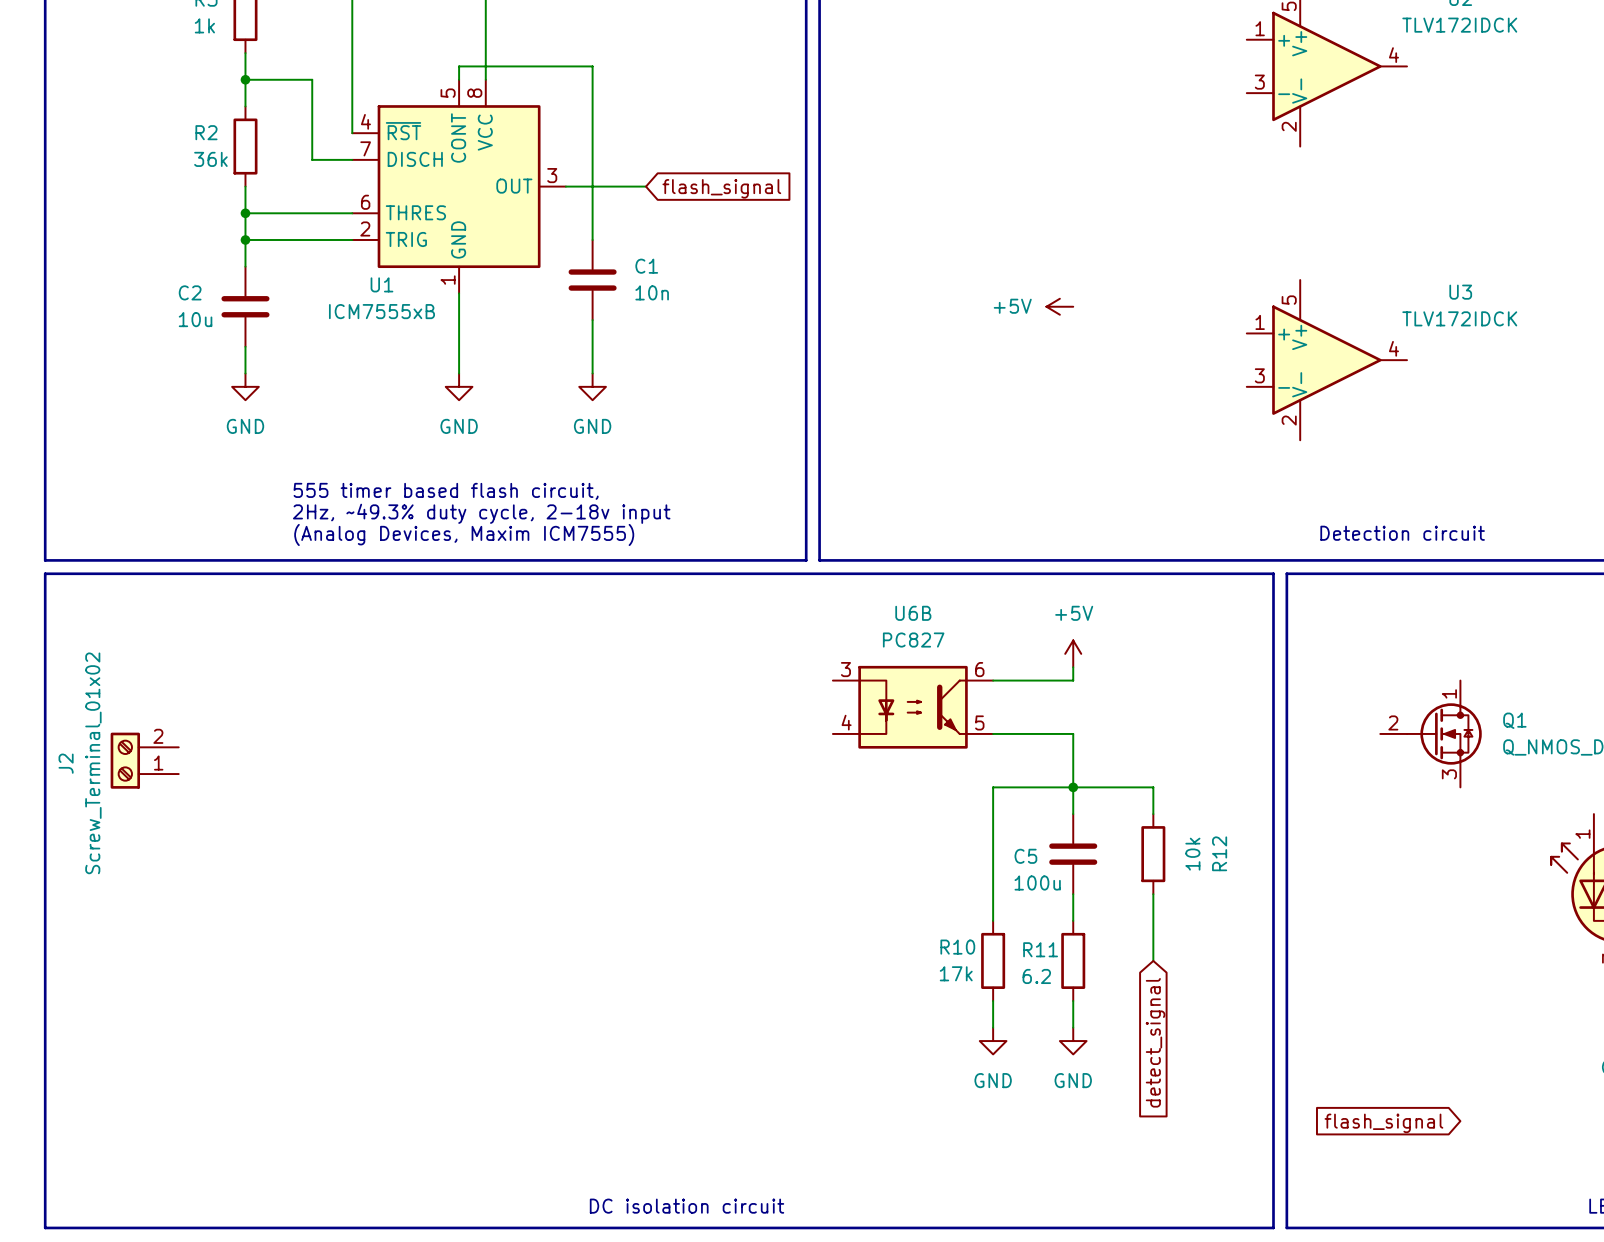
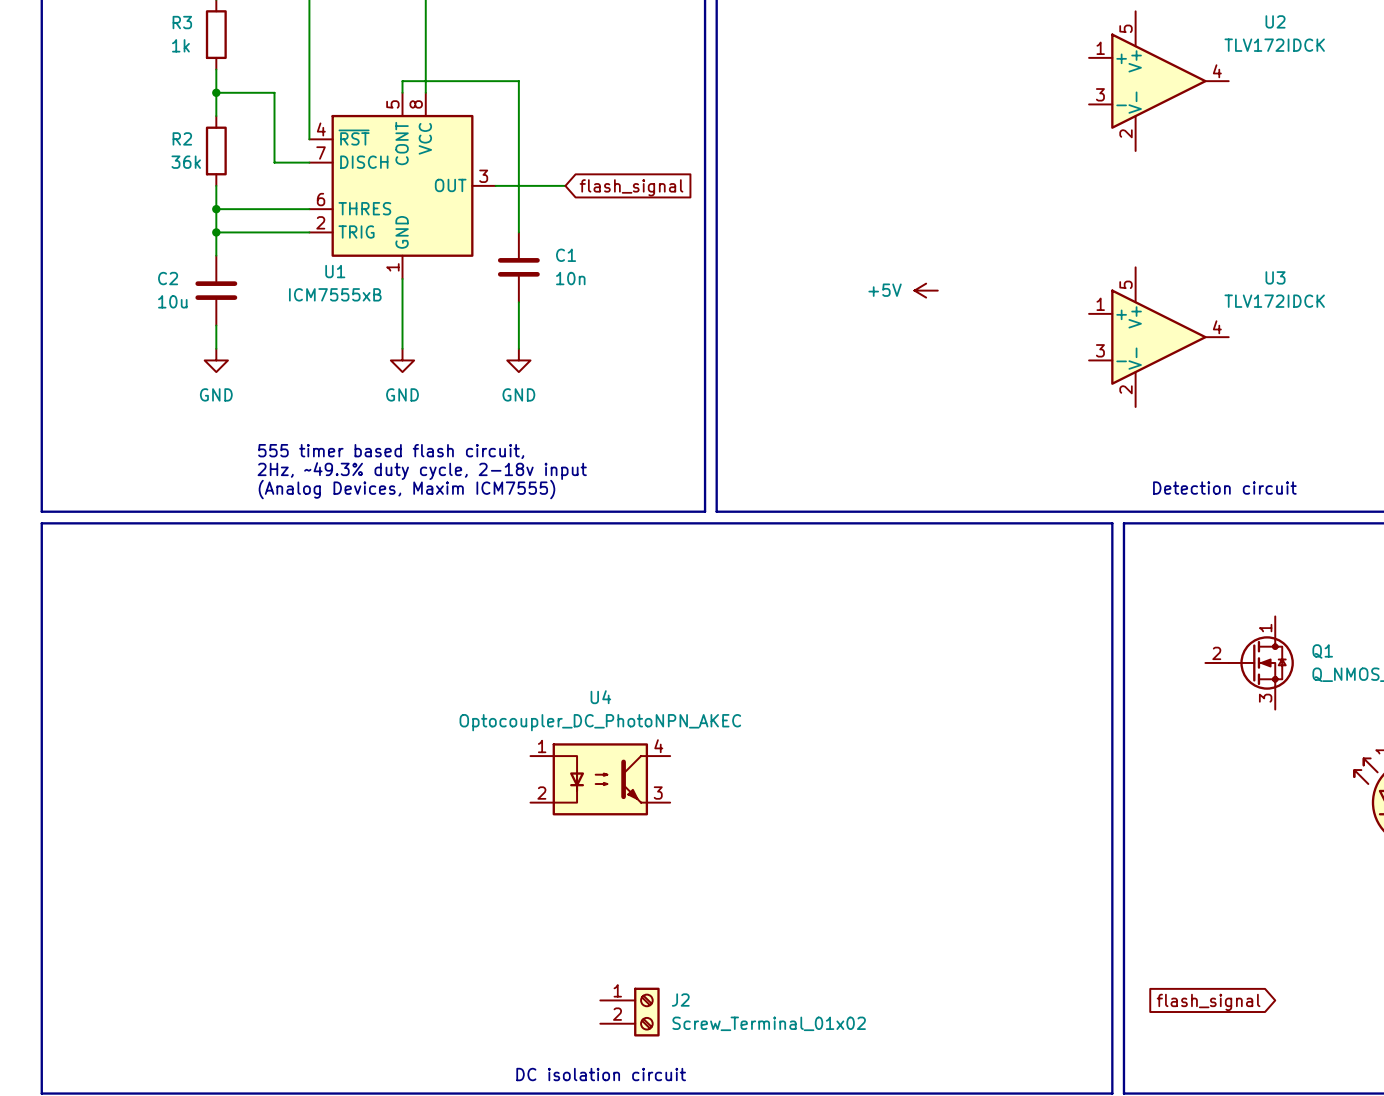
power symbol: +5V (1073, 653) -> none
wire: (1073, 667) (1073, 680) (993, 680) -> none
U6B: PC827 (913, 707) -> none
wire: (993, 733) (1073, 733) (1073, 814) -> none
J2 rotation: 0° (125, 760) -> 180° (646, 1012)
J2 position: (144, 760) -> (630, 1012)
J2 value position: Screw_Terminal_01x02 (93, 763) -> Screw_Terminal_01x02 (769, 1023)
junction: (1073, 787) -> none
wire: (1153, 814) (1153, 787) (993, 787) (993, 920) -> none
C5: 100u (1073, 854) -> none
R12: 10k (1153, 854) -> none
U4: none -> Optocoupler_DC_PhotoNPN_AKEC (600, 779)
wire: (1073, 894) (1073, 920) -> none
wire: (1153, 894) (1153, 960) -> none
R10: 17k (993, 960) -> none
R11: 6.2 (1073, 960) -> none
wire: (993, 1000) (993, 1027) -> none
wire: (1073, 1000) (1073, 1027) -> none
power symbol: GND (993, 1041) -> none
power symbol: GND (1073, 1041) -> none
global label: detect_signal (1155, 1042) -> none

